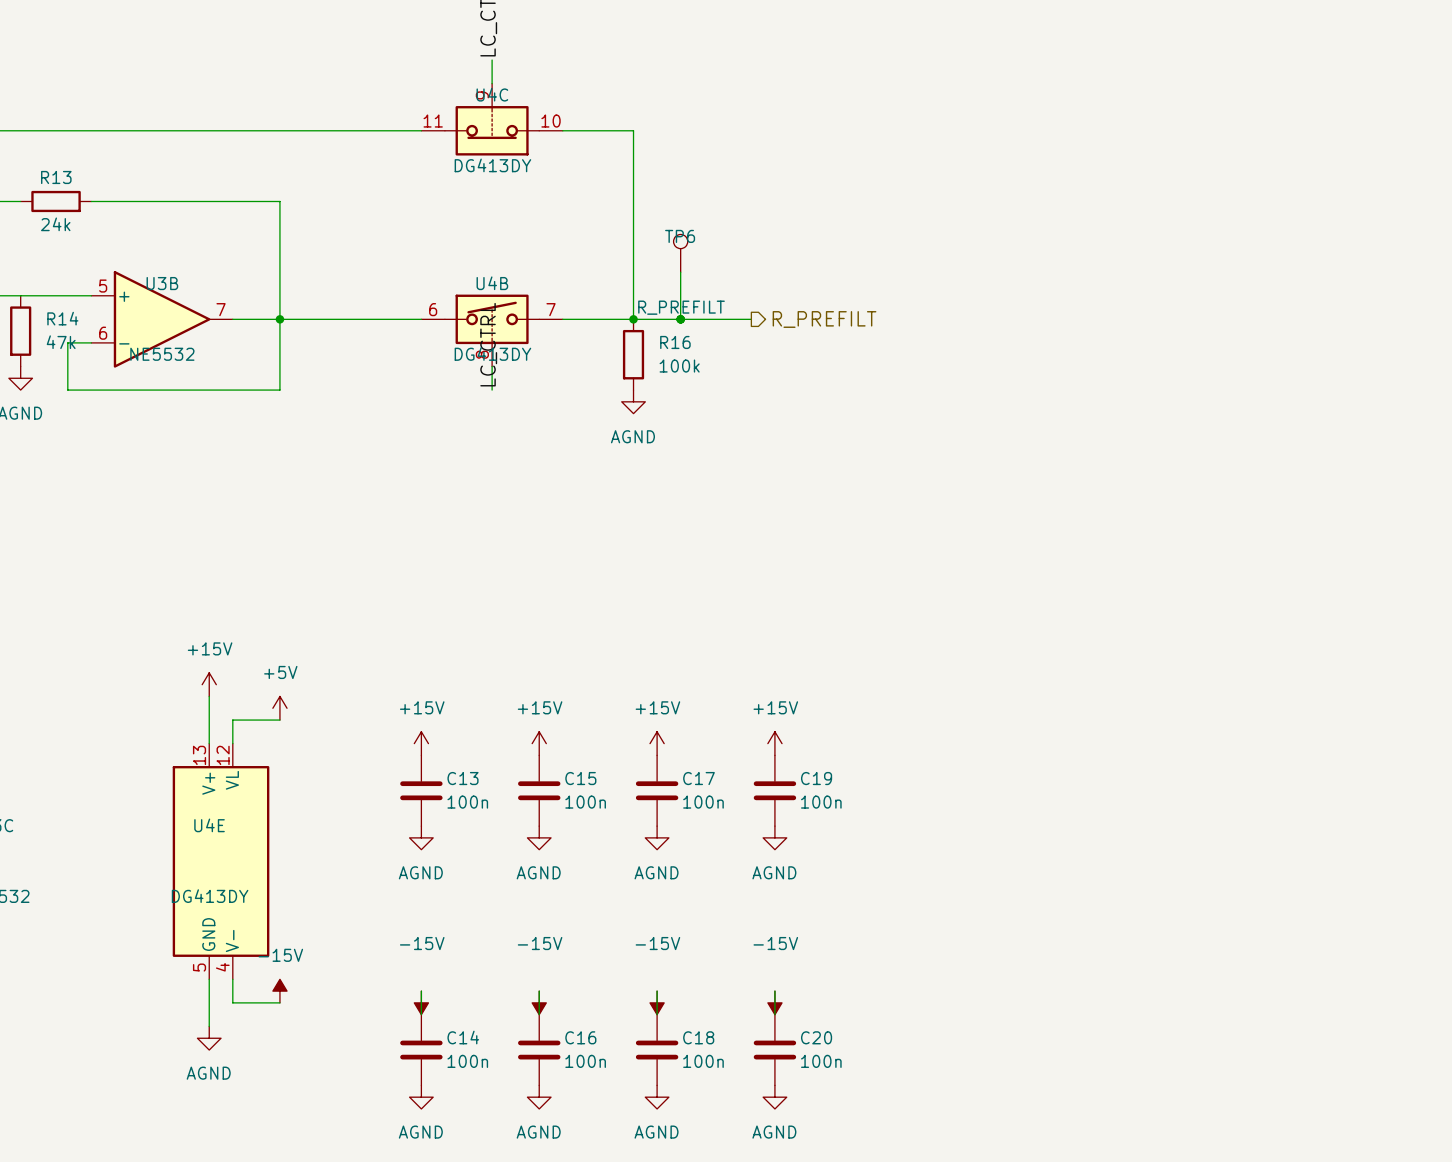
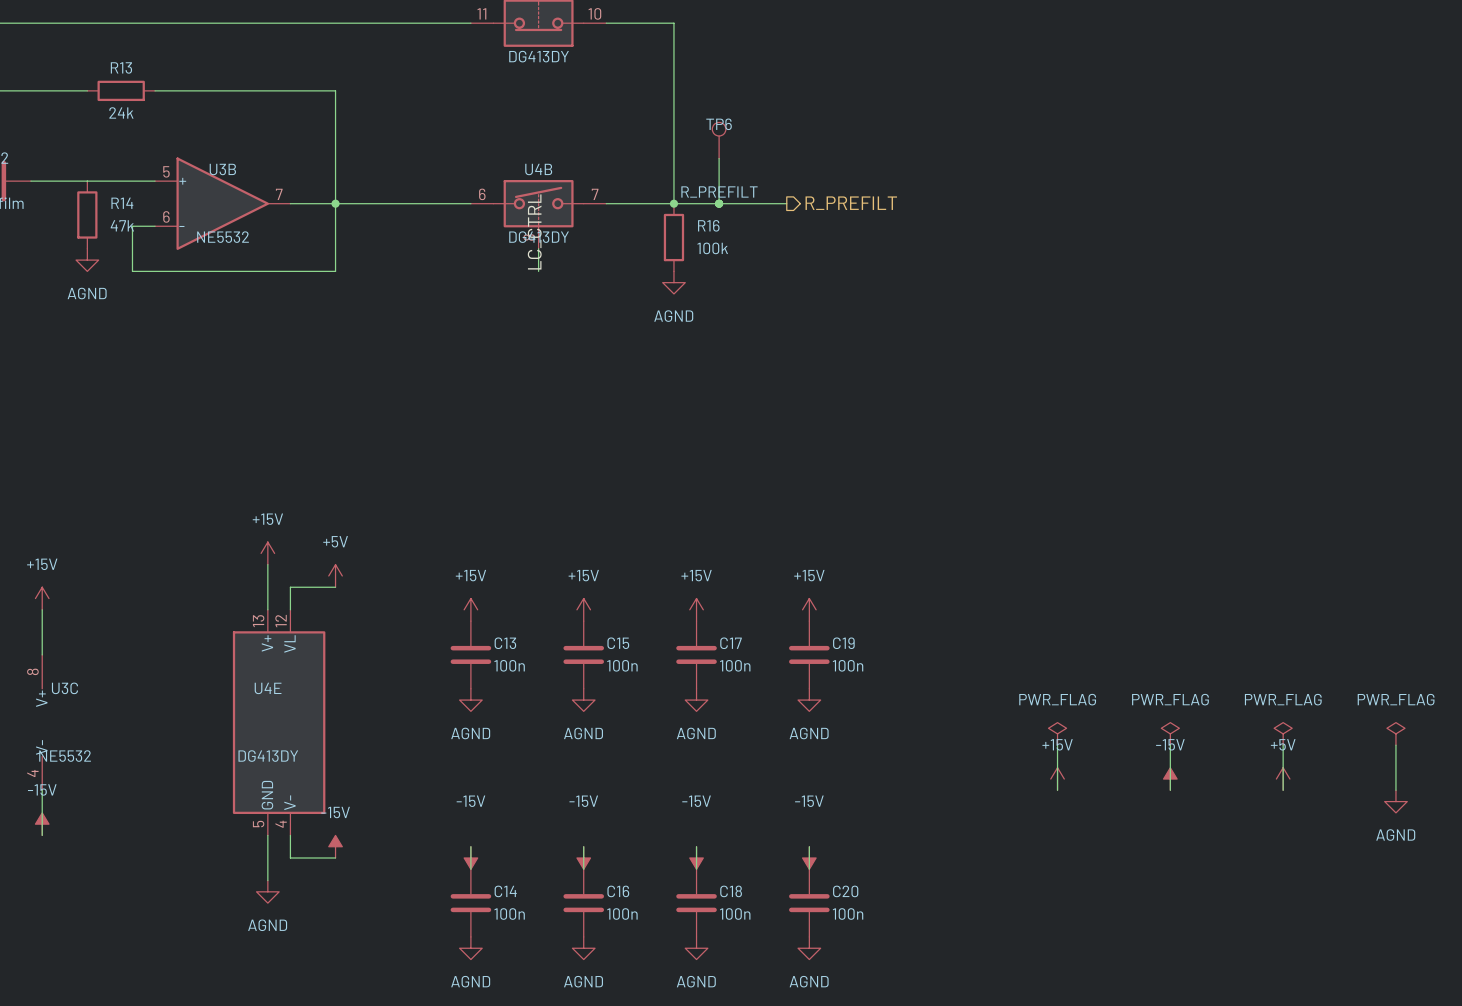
power symbol: none -> PWR_FLAG (1057, 733)
power symbol: none -> PWR_FLAG (1170, 733)
power symbol: none -> PWR_FLAG (1283, 733)
power symbol: none -> PWR_FLAG (1395, 733)
wire: none -> (1057, 745) (1057, 790)
wire: none -> (1170, 745) (1170, 790)
wire: none -> (1283, 745) (1283, 790)
wire: none -> (1395, 745) (1395, 790)
power symbol: none -> +15V (1057, 779)
power symbol: none -> -15V (1170, 779)
power symbol: none -> +5V (1283, 779)
power symbol: none -> AGND (1395, 801)

